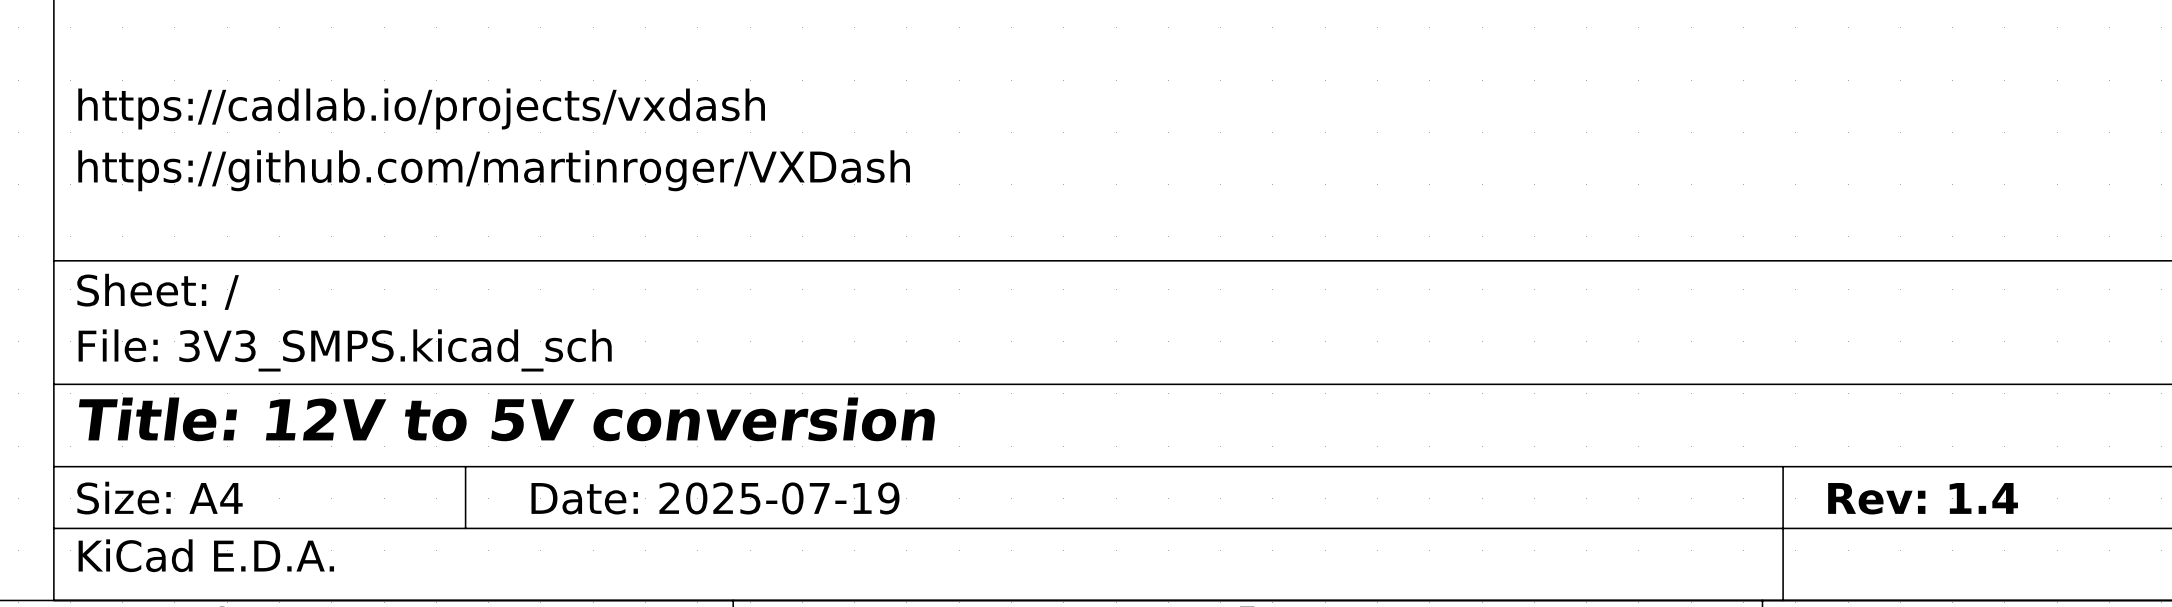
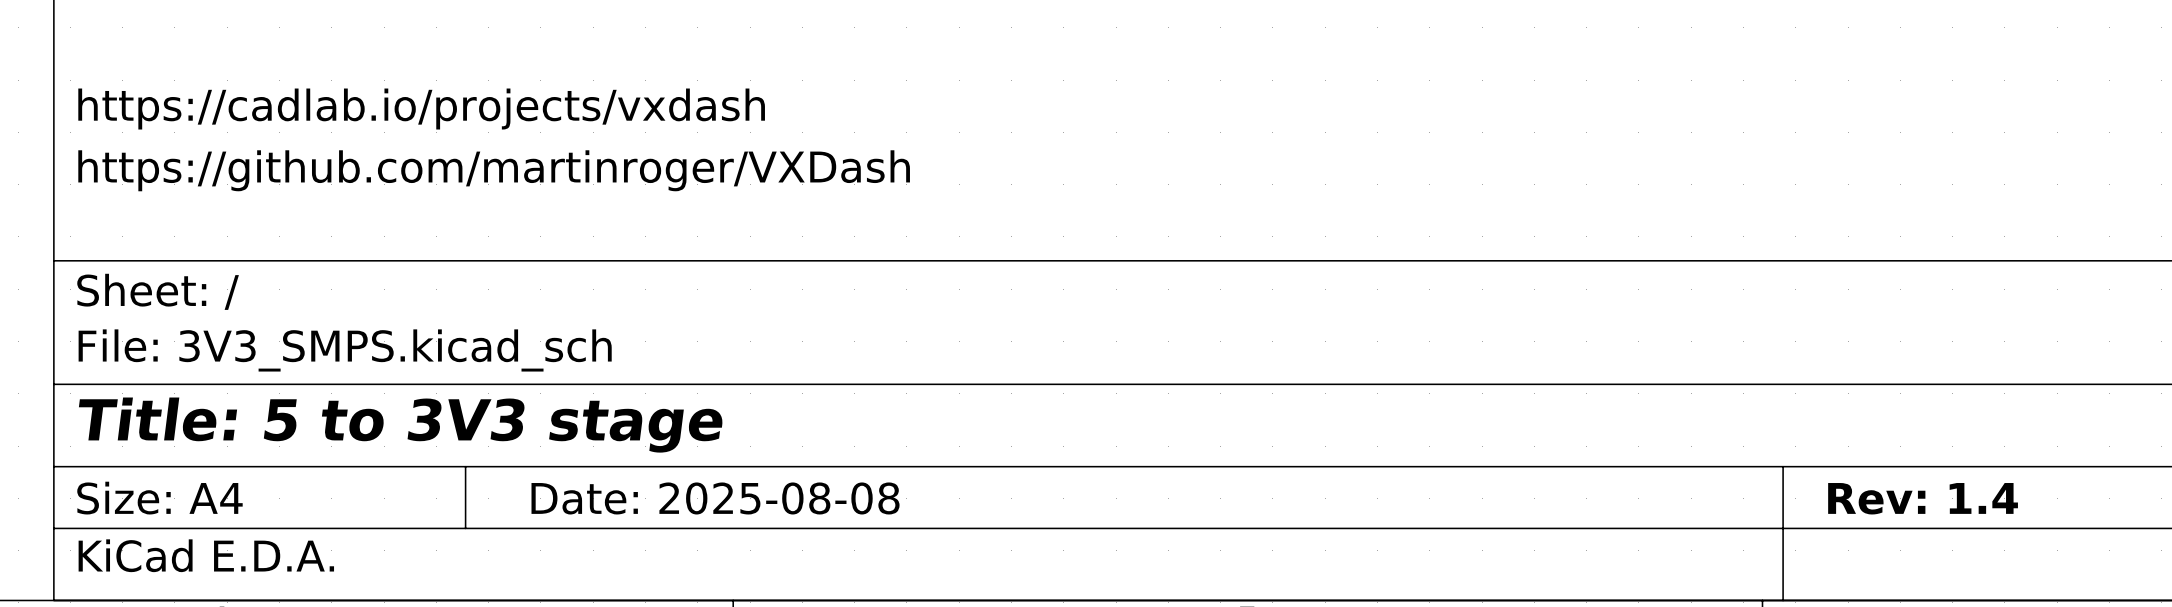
title block: Title: 12V to 5V conversion (507, 419) -> Title: 5 to 3V3 stage (401, 425)
title block: Date: 2025-07-19 (715, 498) -> Date: 2025-08-08 (715, 498)

